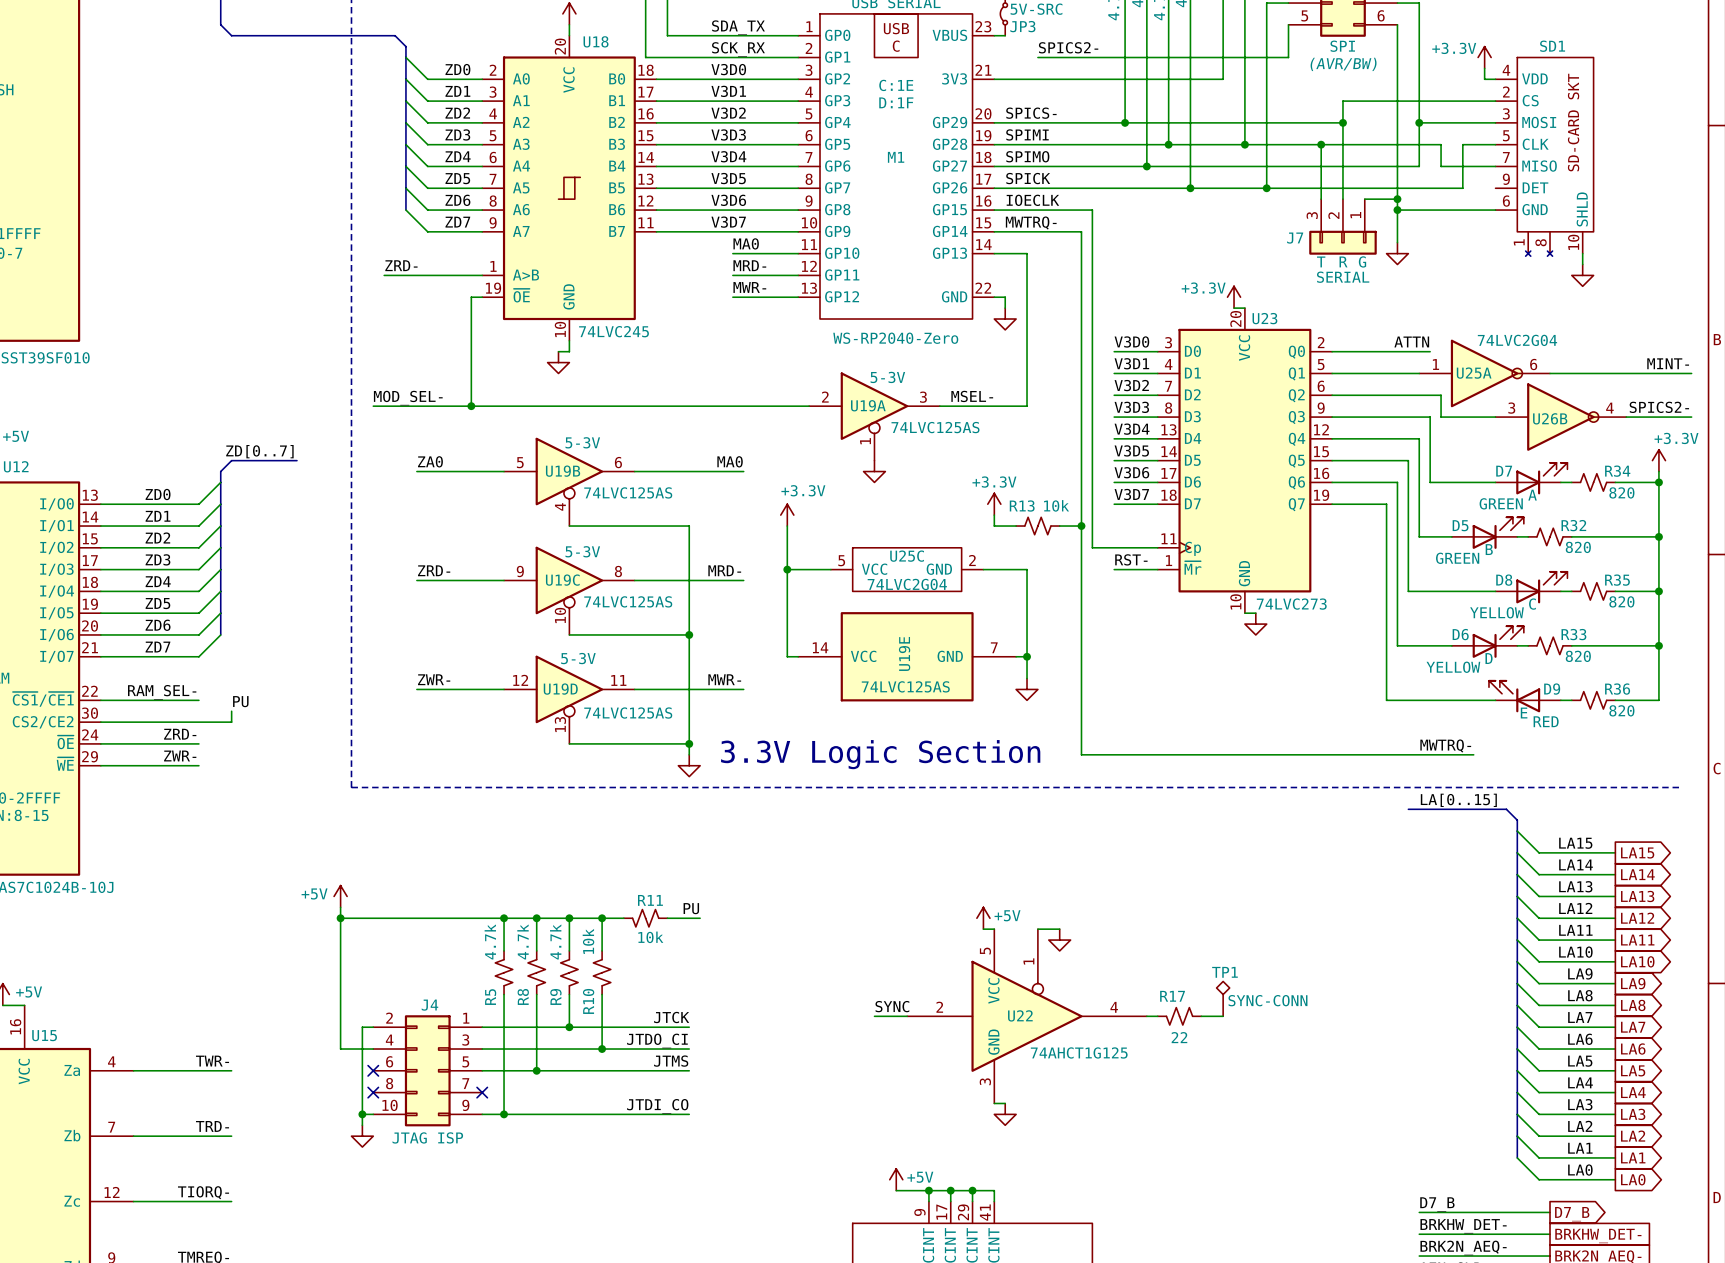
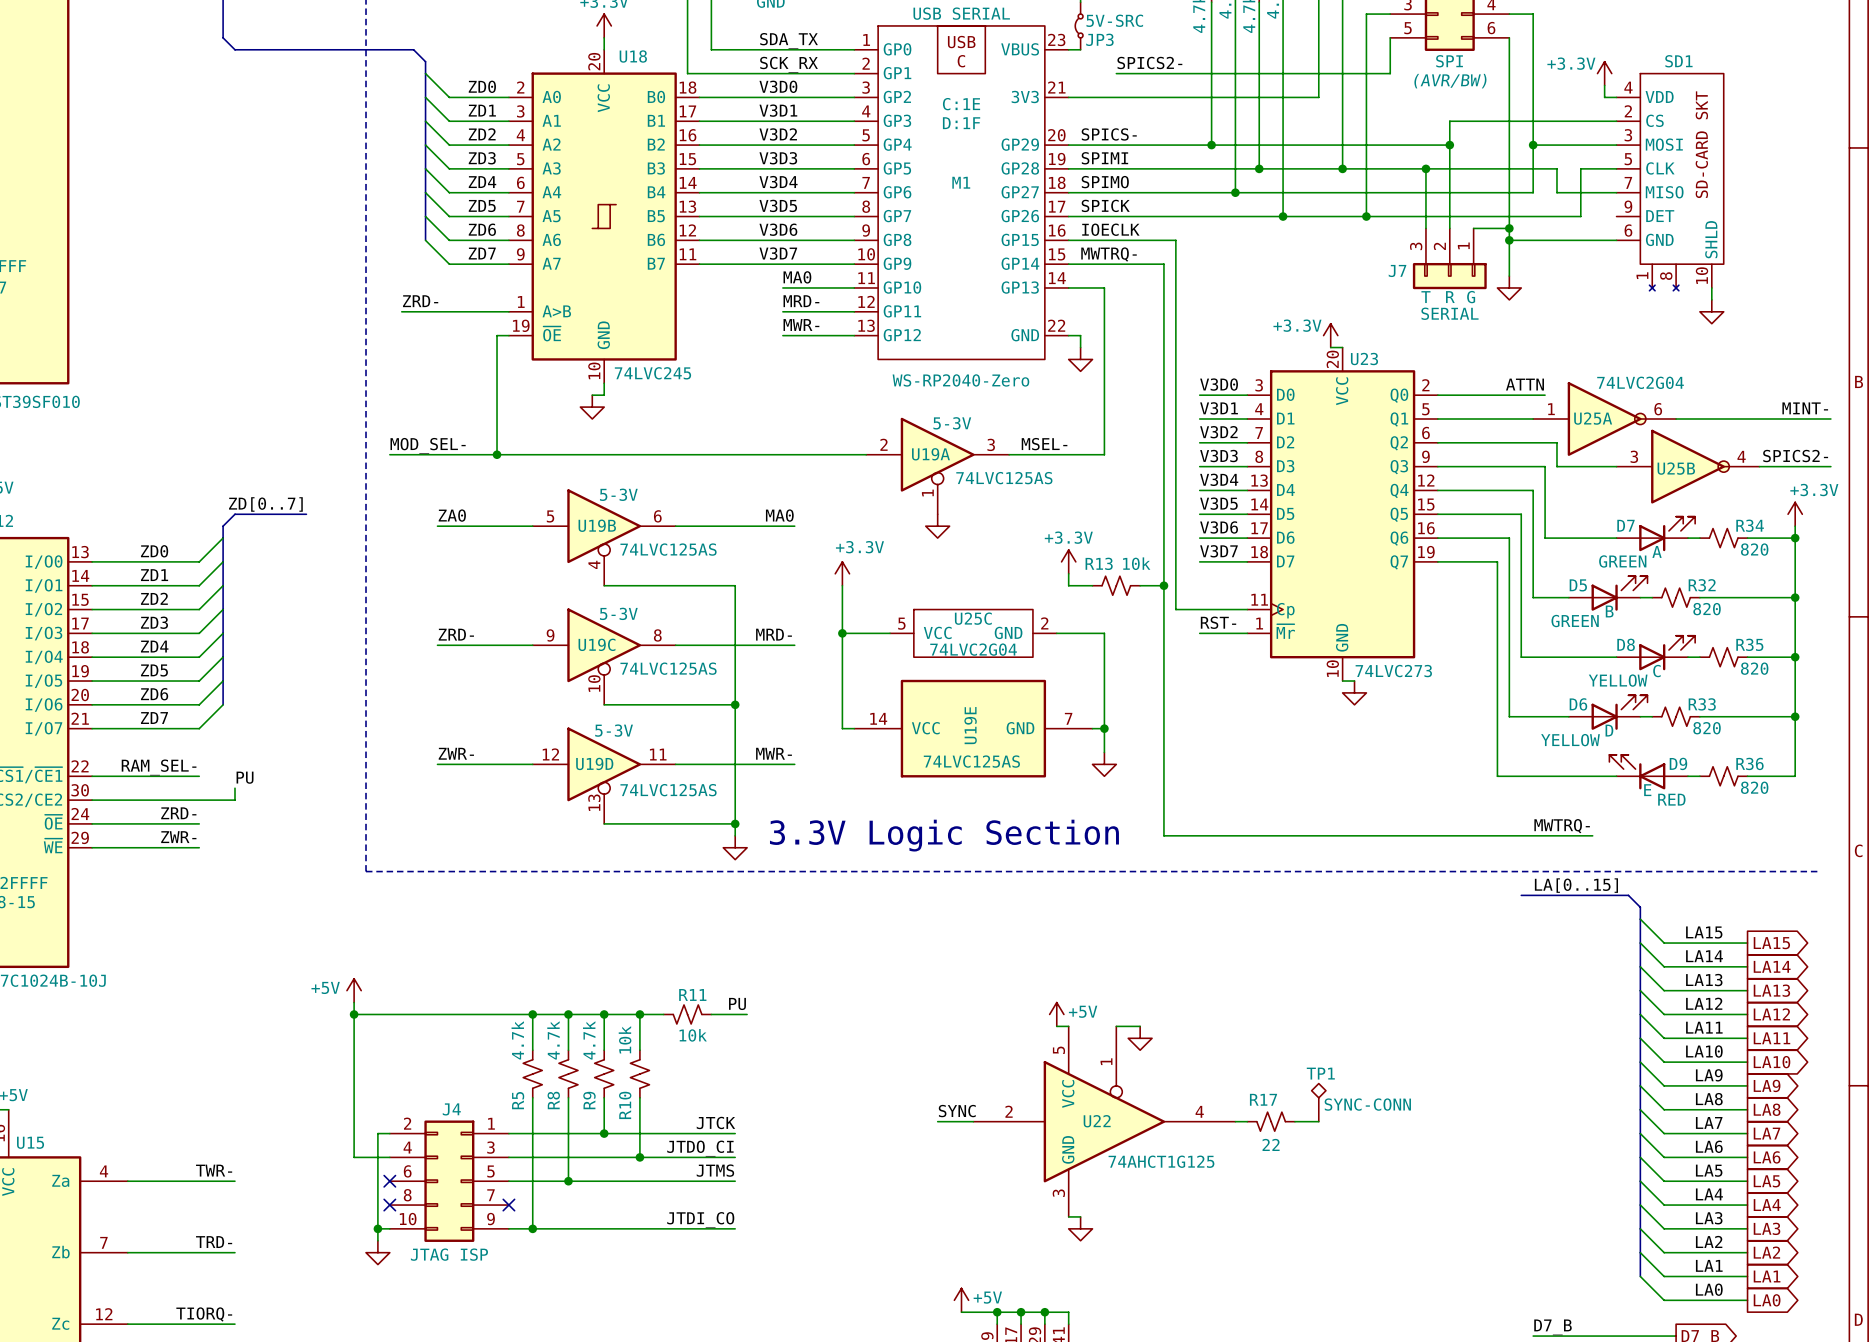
U26B name: U26B (1550, 418) -> U25B (1676, 468)

